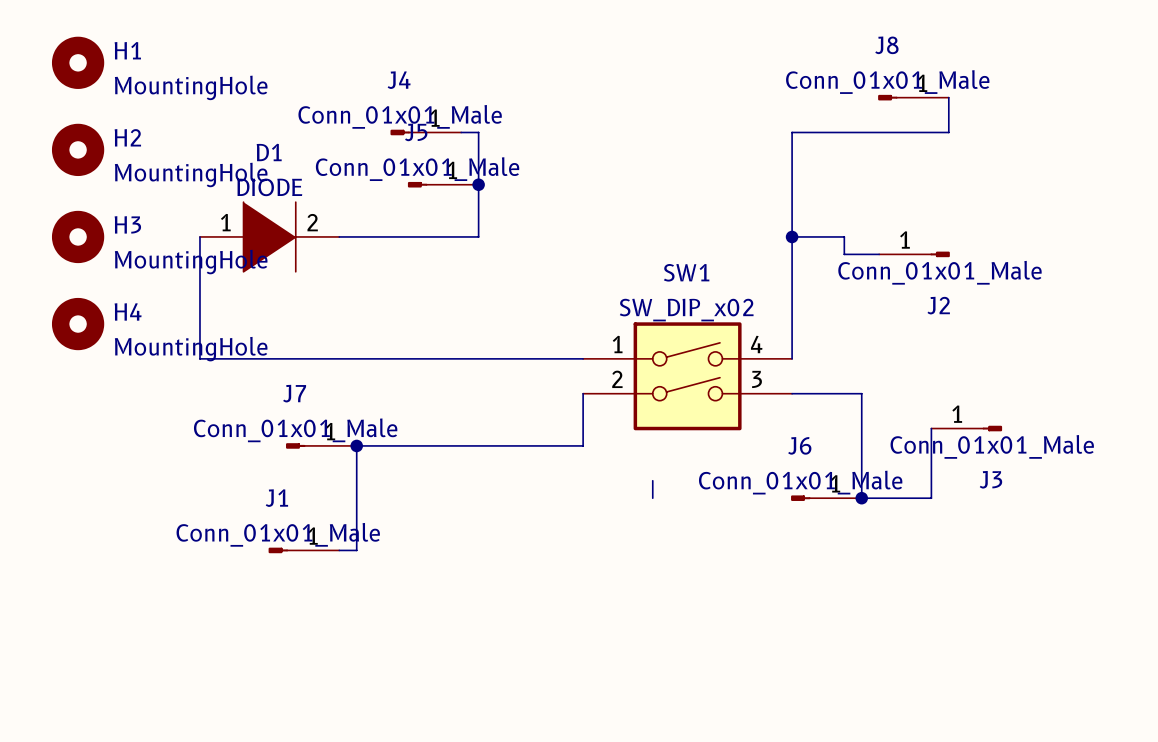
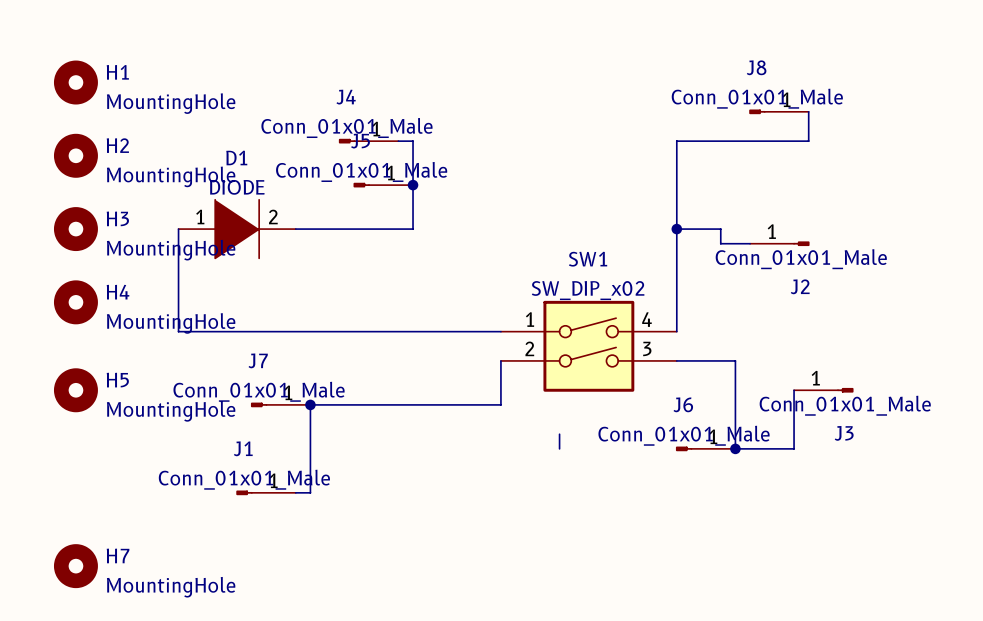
H5: none -> MountingHole (75, 390)
H7: none -> MountingHole (75, 566)

